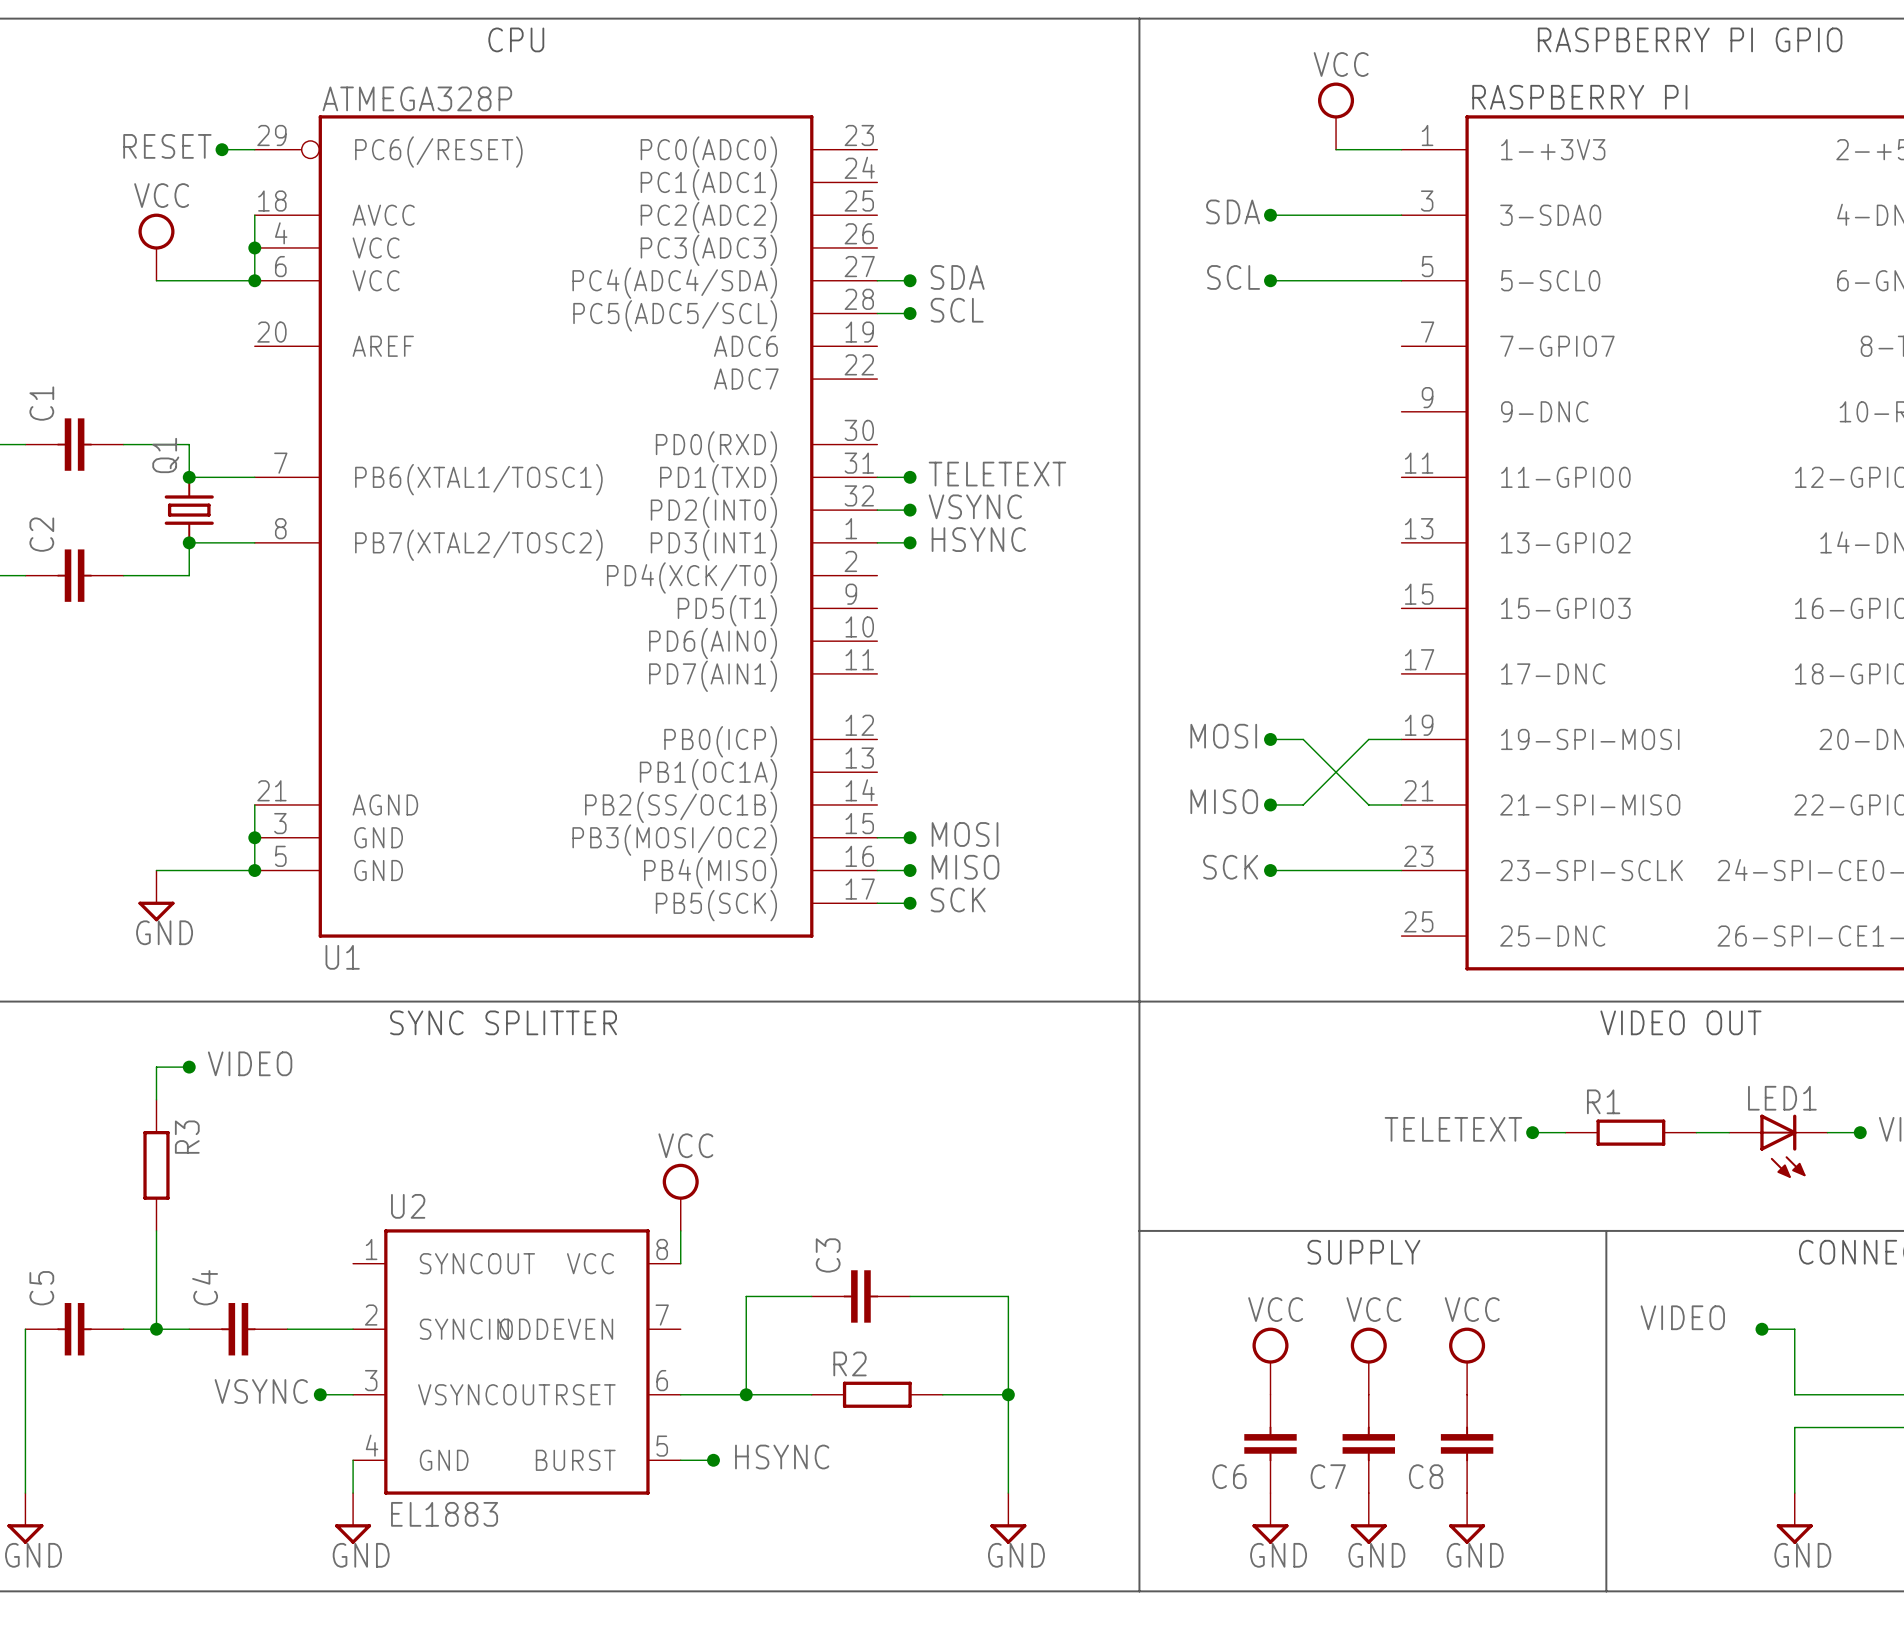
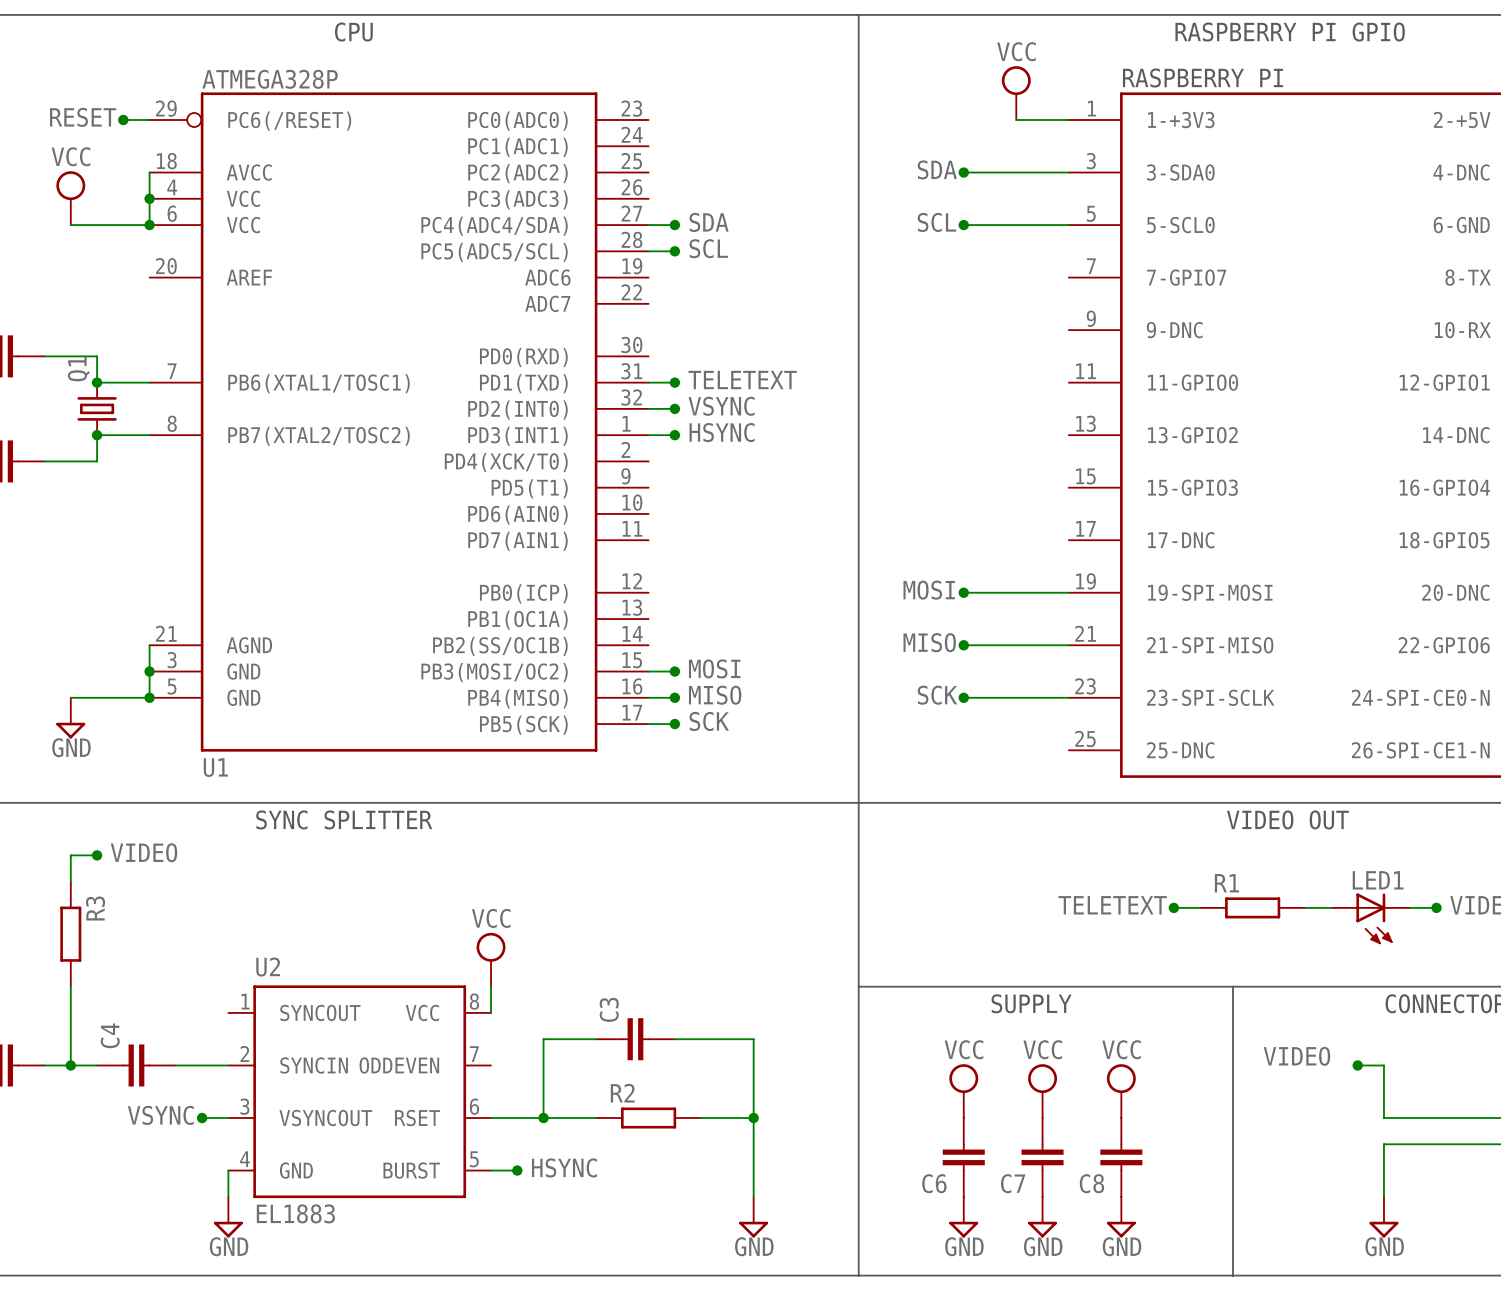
wire: (1303, 739) (1368, 804) -> (990, 592) (1042, 592)
wire: (1368, 739) (1303, 804) -> (1042, 645) (990, 645)

